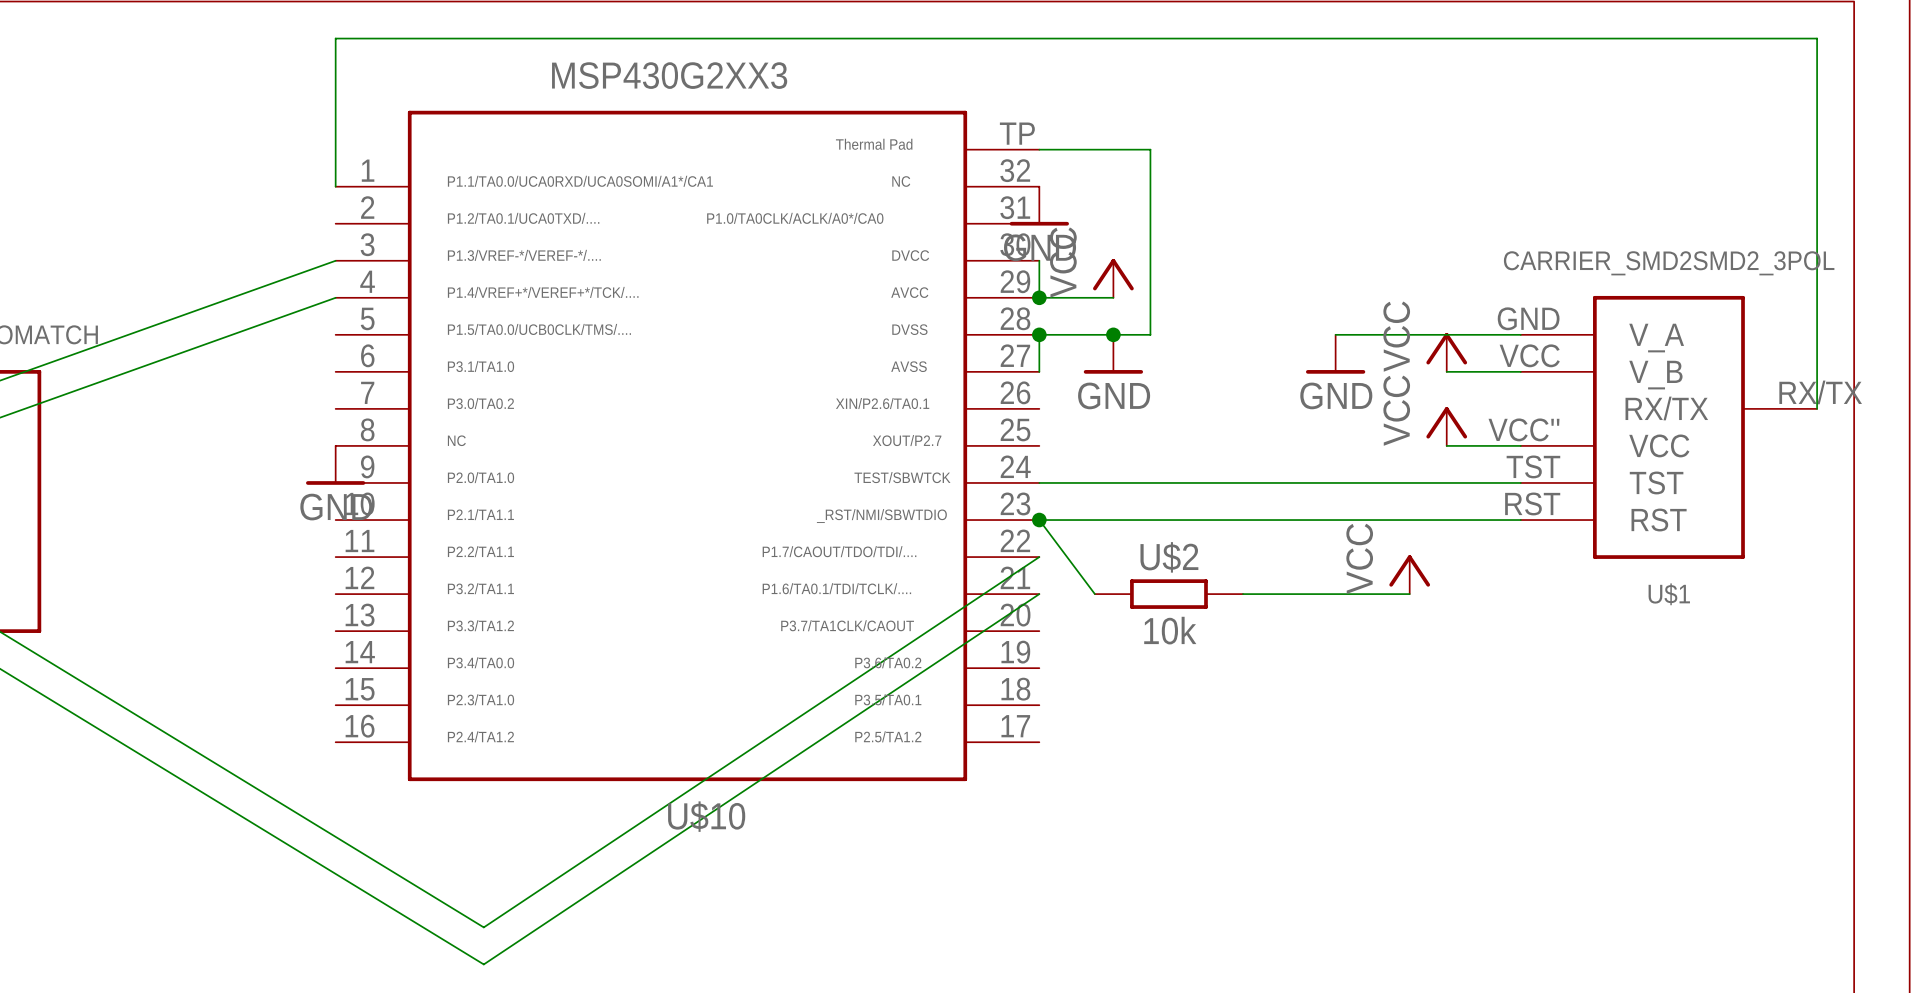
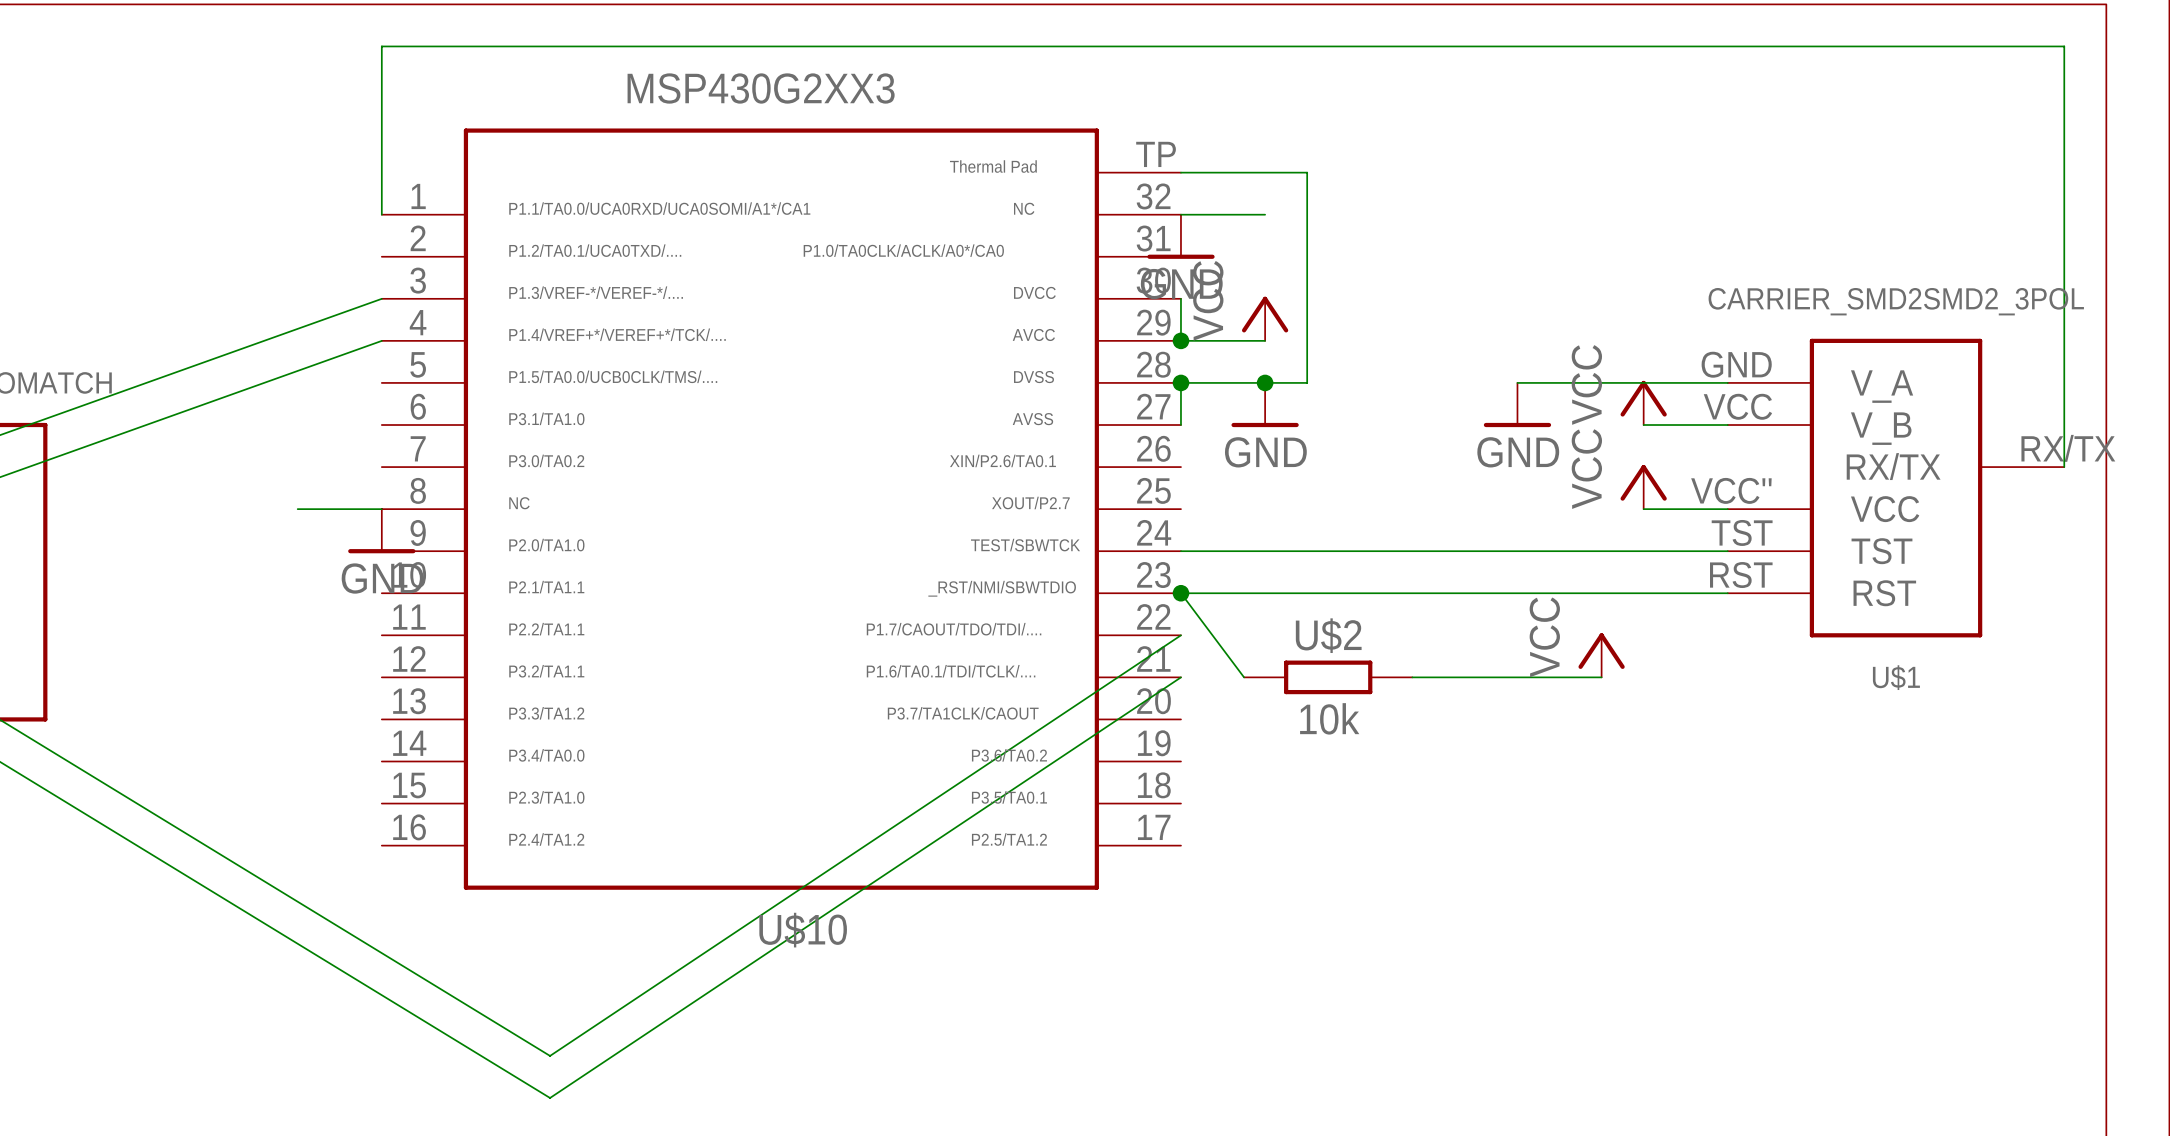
wire: none -> (1180, 214) (1265, 214)
wire: none -> (297, 509) (381, 509)

